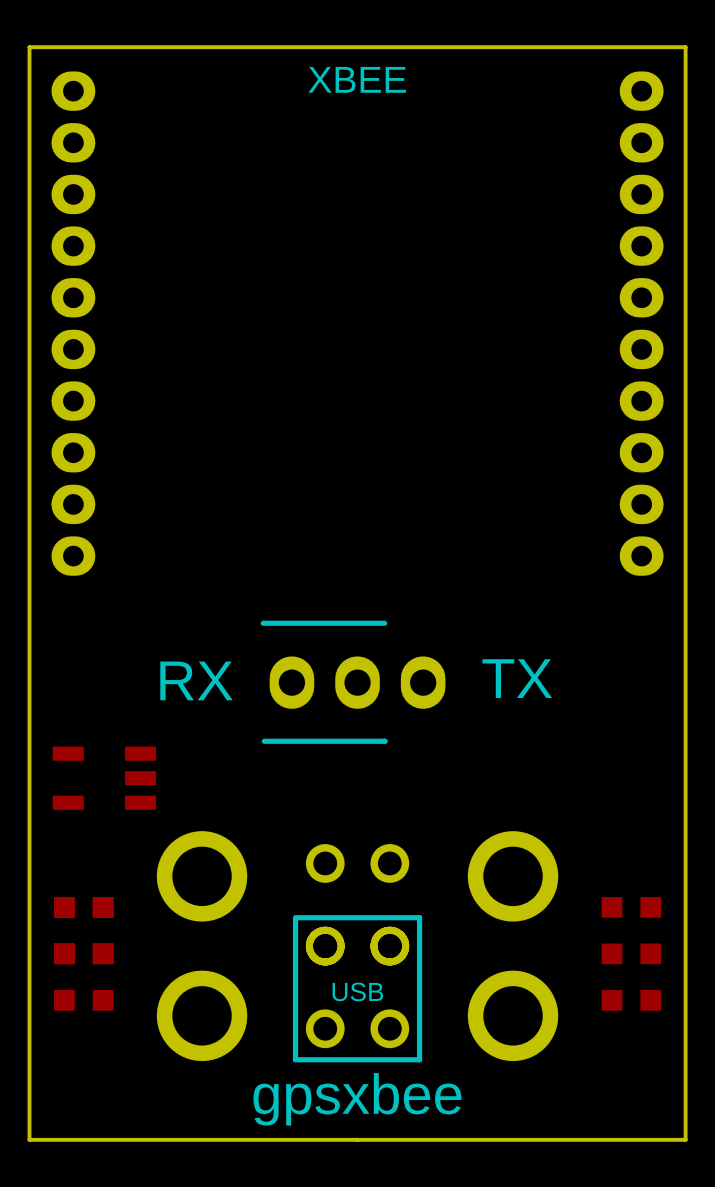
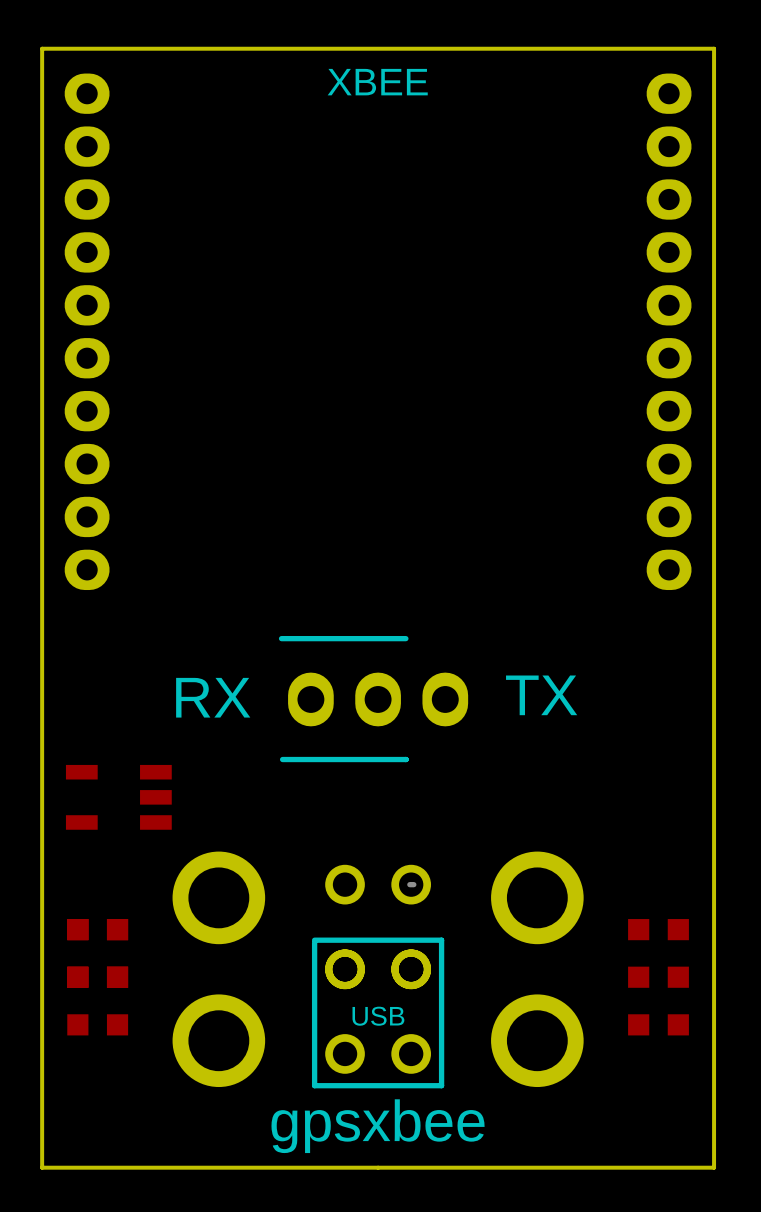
line: none -> (409, 884) (413, 884)

